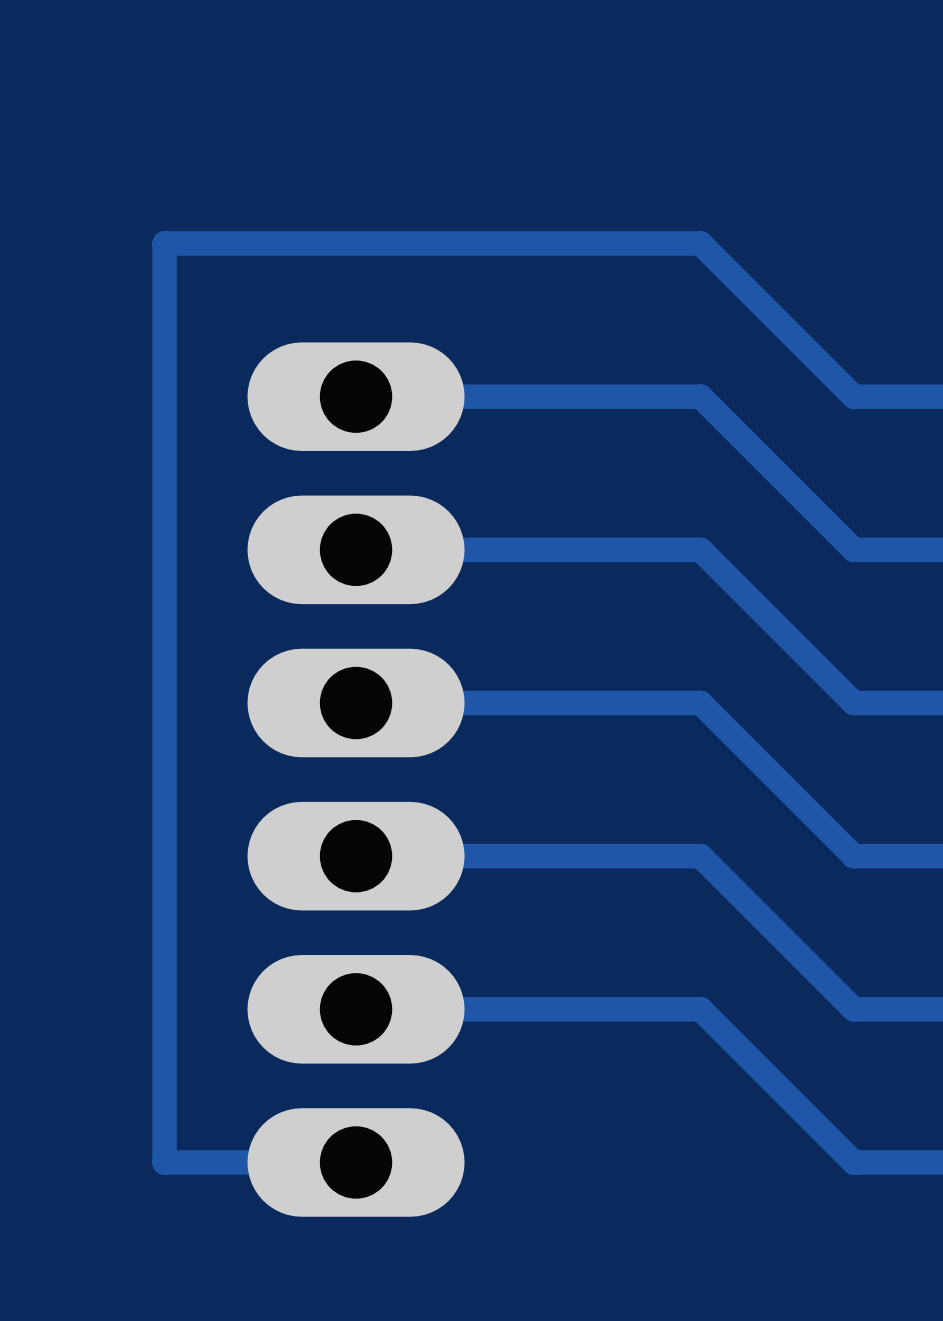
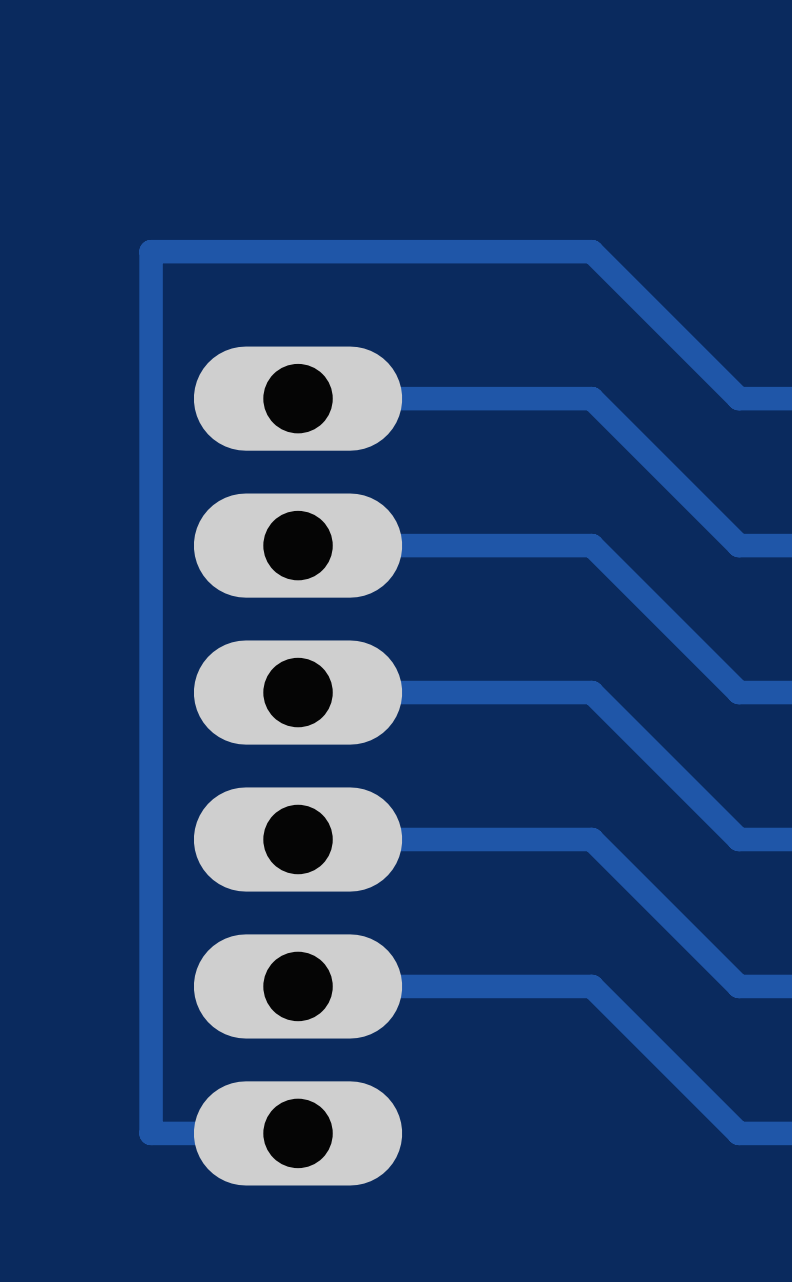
track: (241, 243) (164, 243) (164, 1162) (241, 1162) -> (151, 251) (151, 1133)
part position: (356, 779) -> (298, 766)

